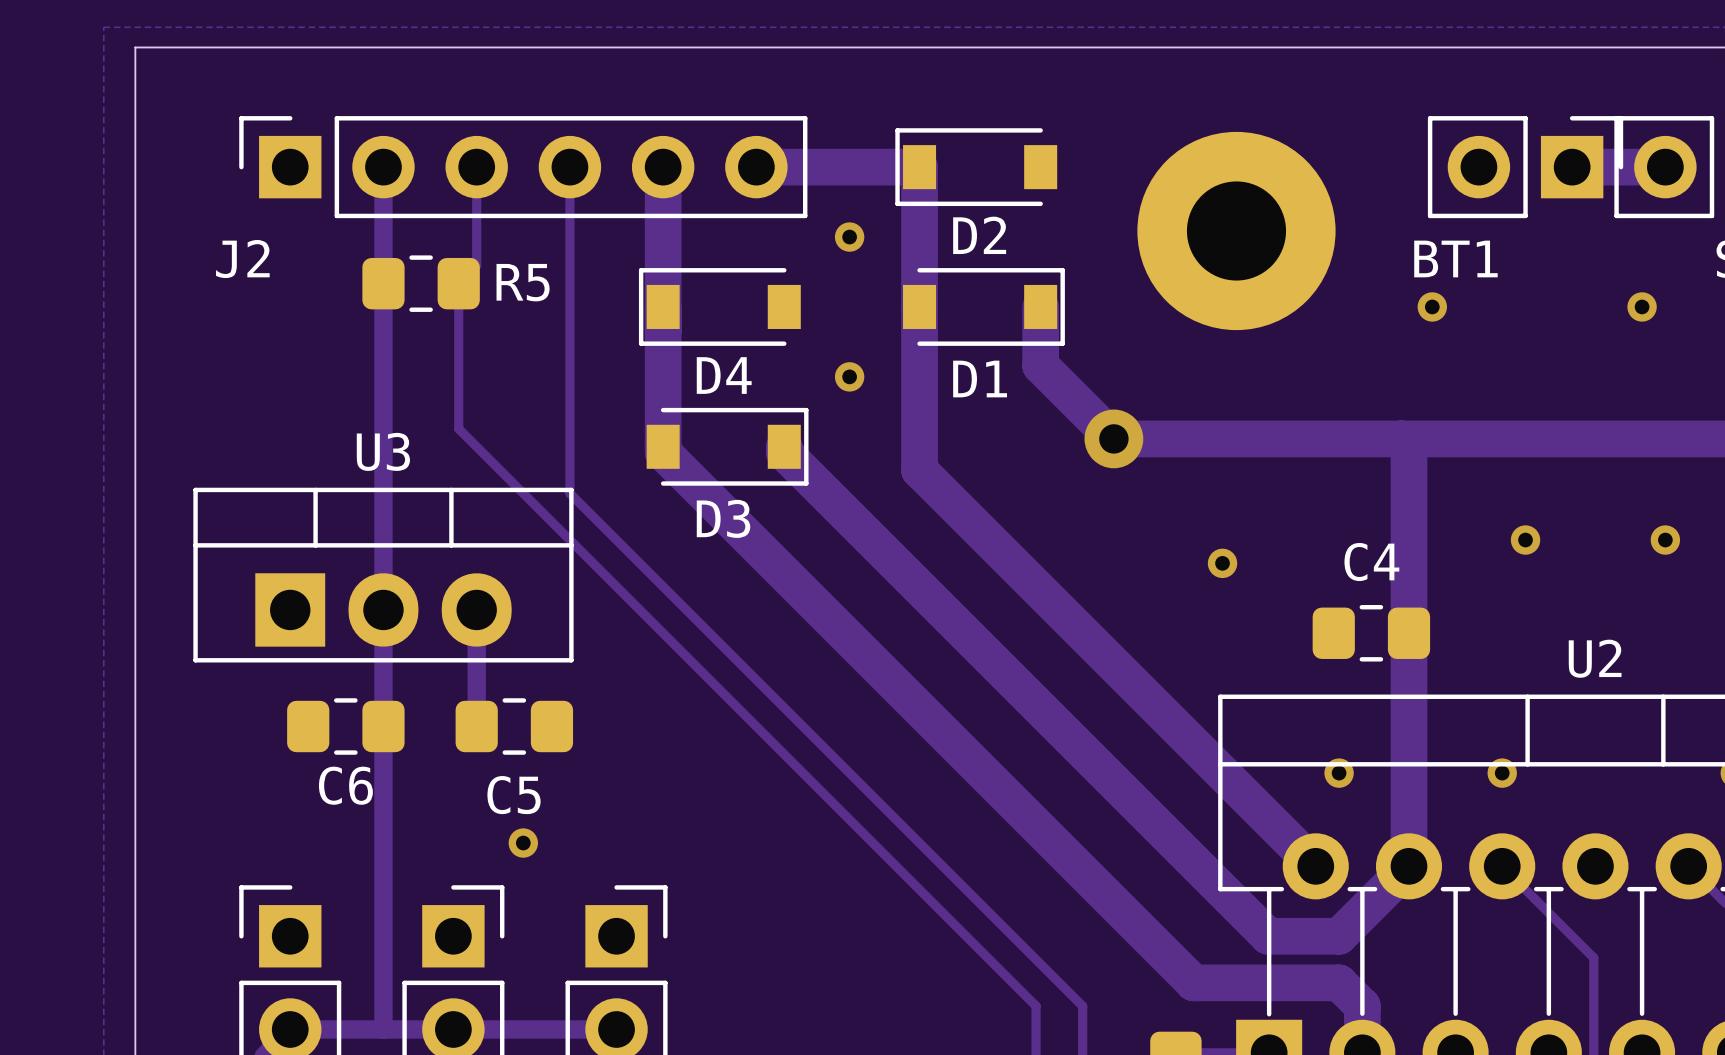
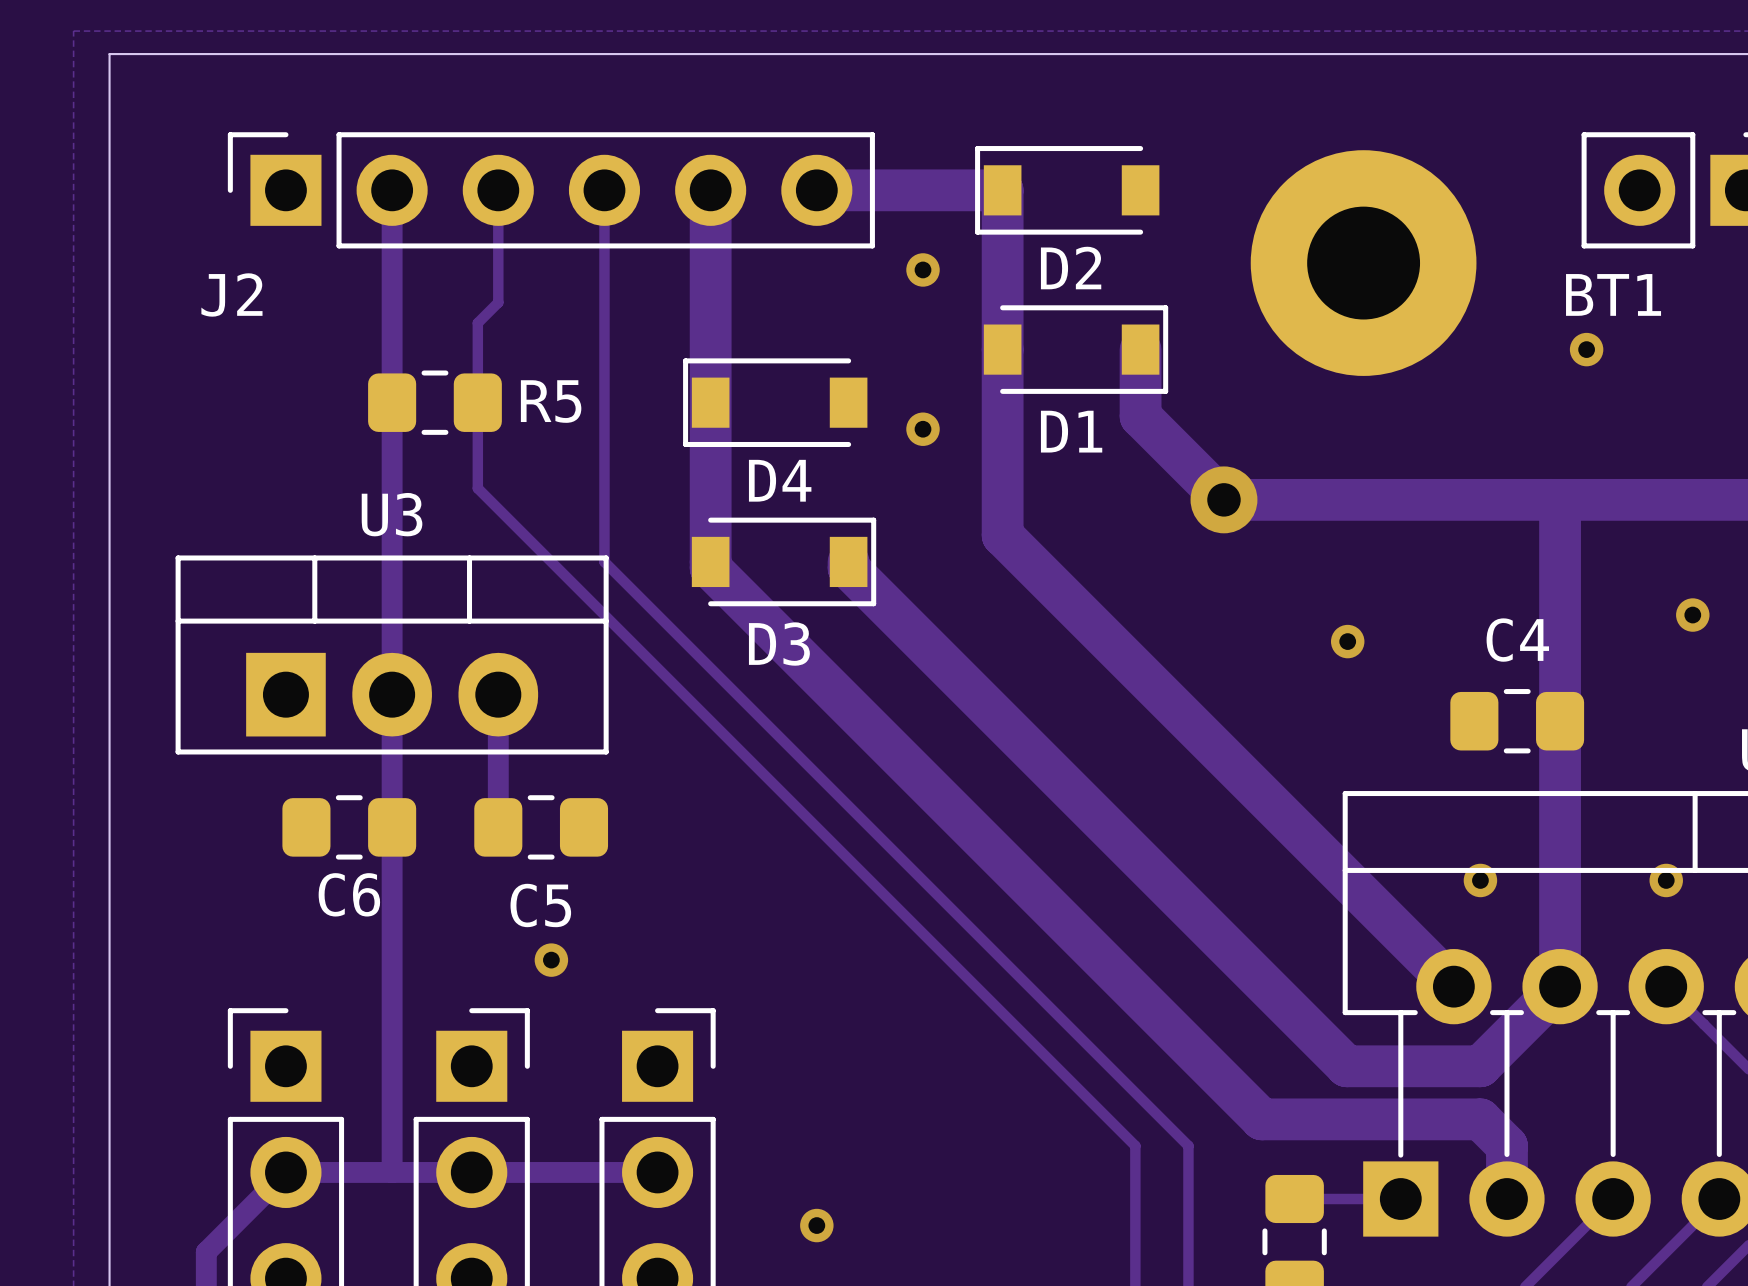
R5 position: (421, 283) -> (434, 402)
D4 position: (719, 306) -> (775, 402)
D3 position: (727, 446) -> (784, 561)
track: (784, 446) (784, 452) (1268, 936) -> (848, 561) (848, 568) (1346, 1066) (1399, 1066)
track: (663, 452) (1193, 982) -> (710, 515) (710, 568) (1261, 1119) (1314, 1119)

